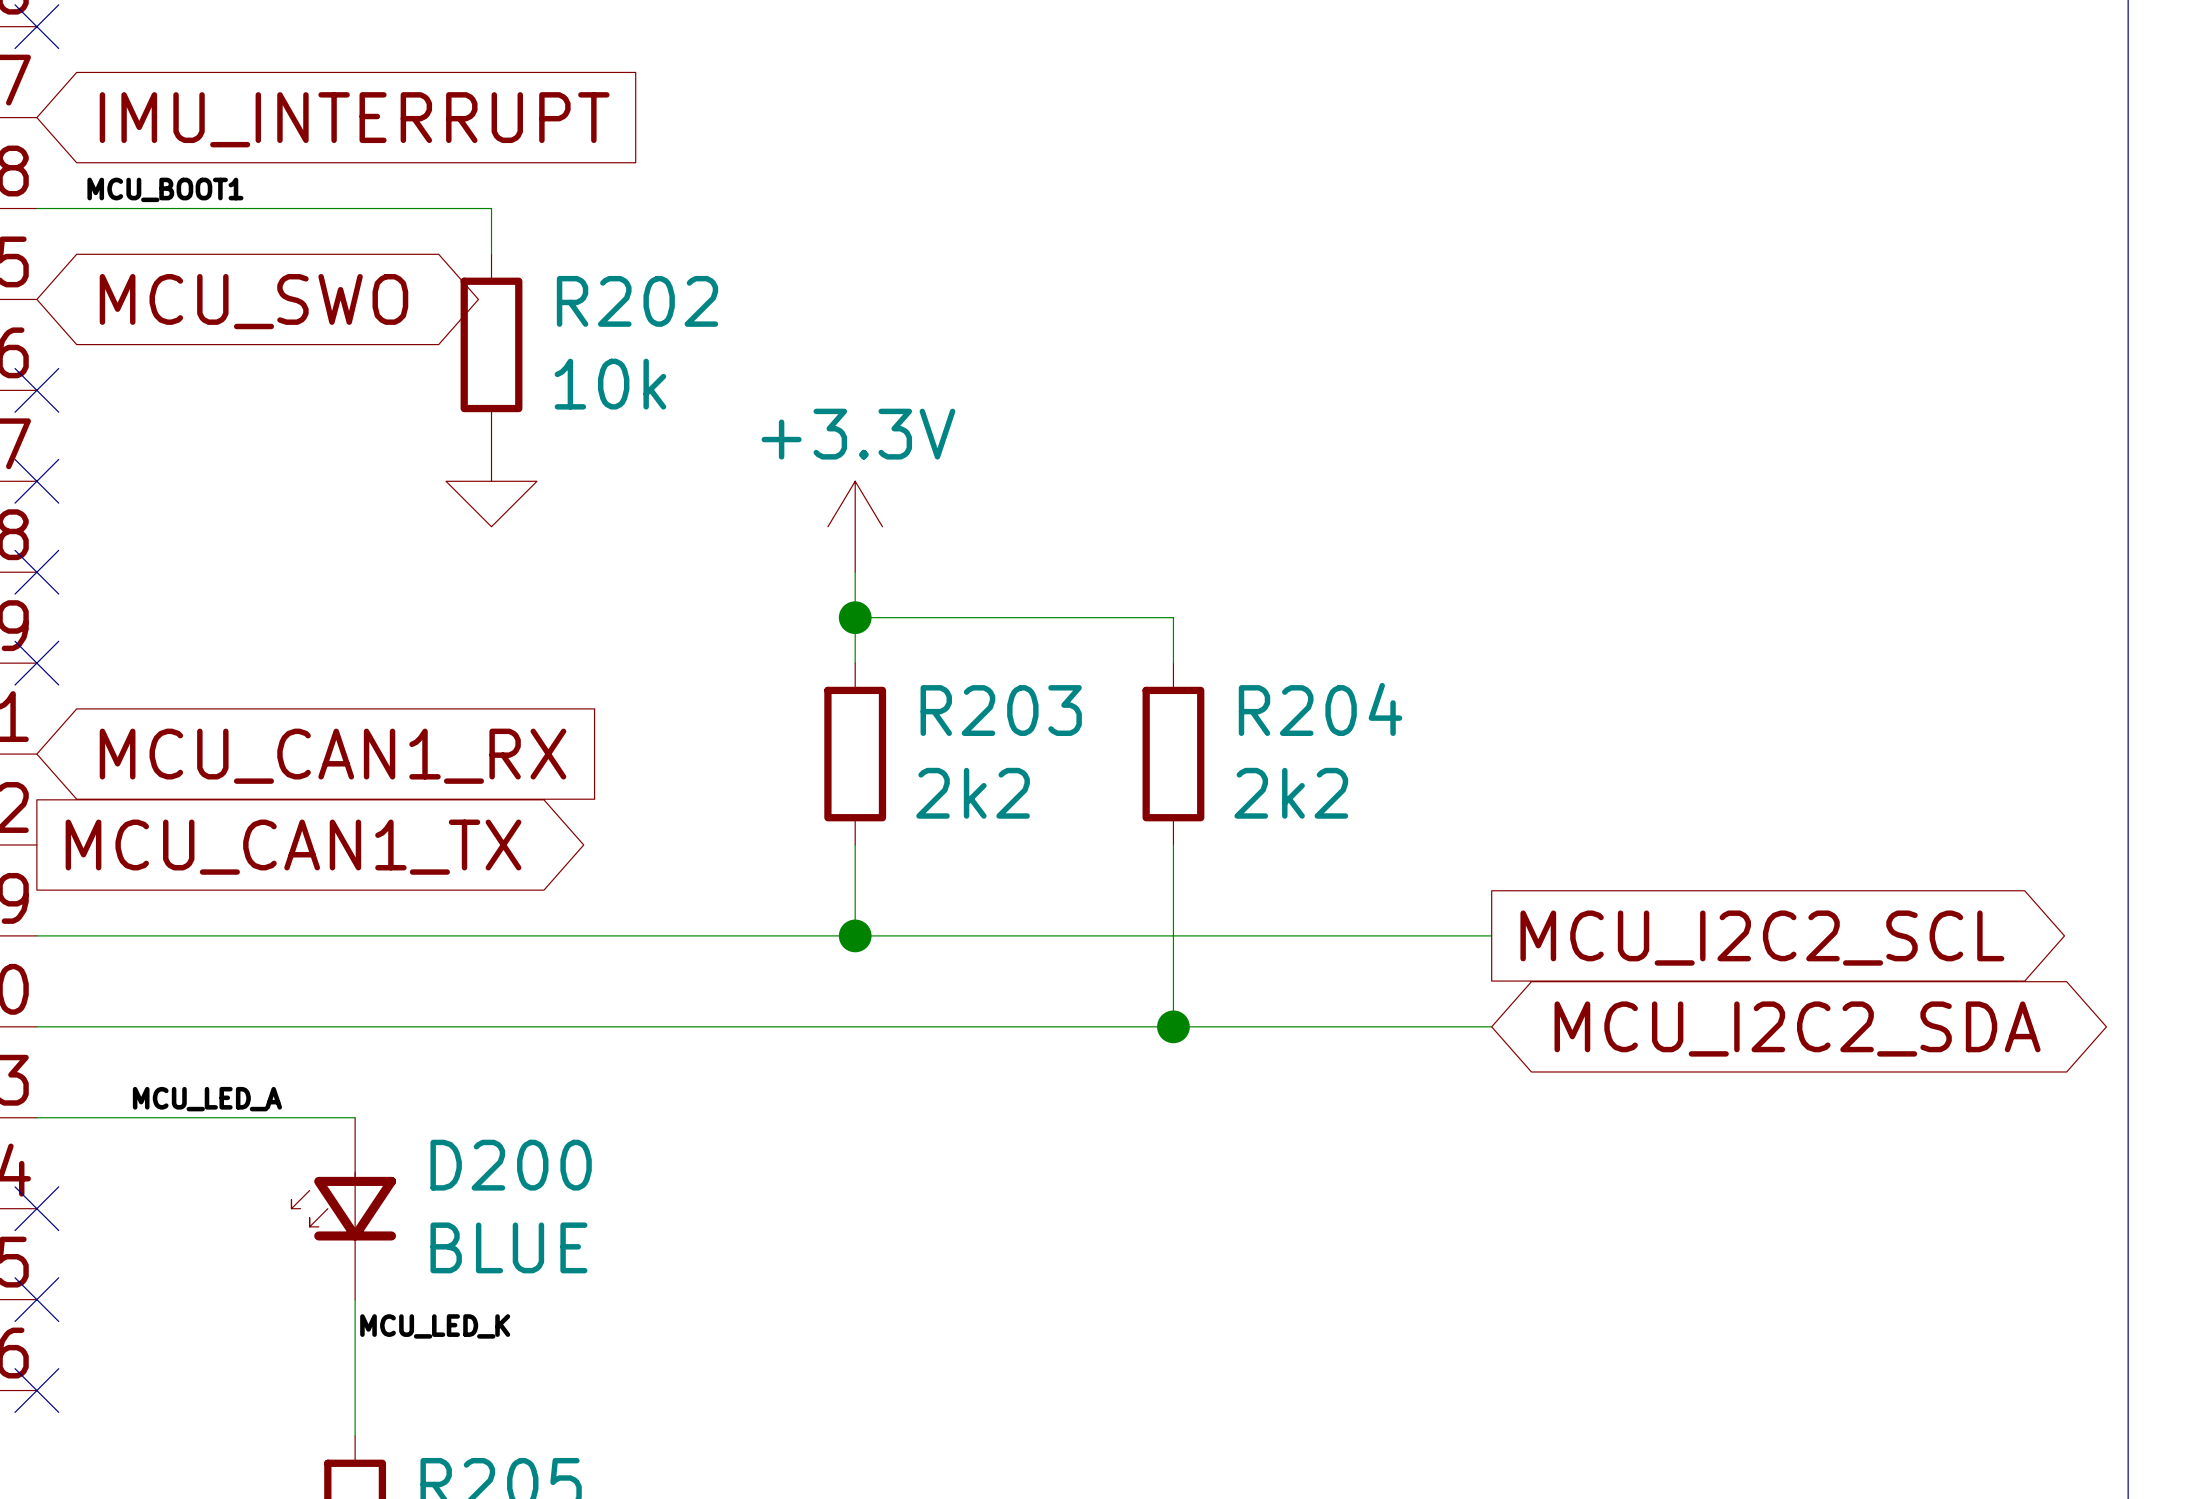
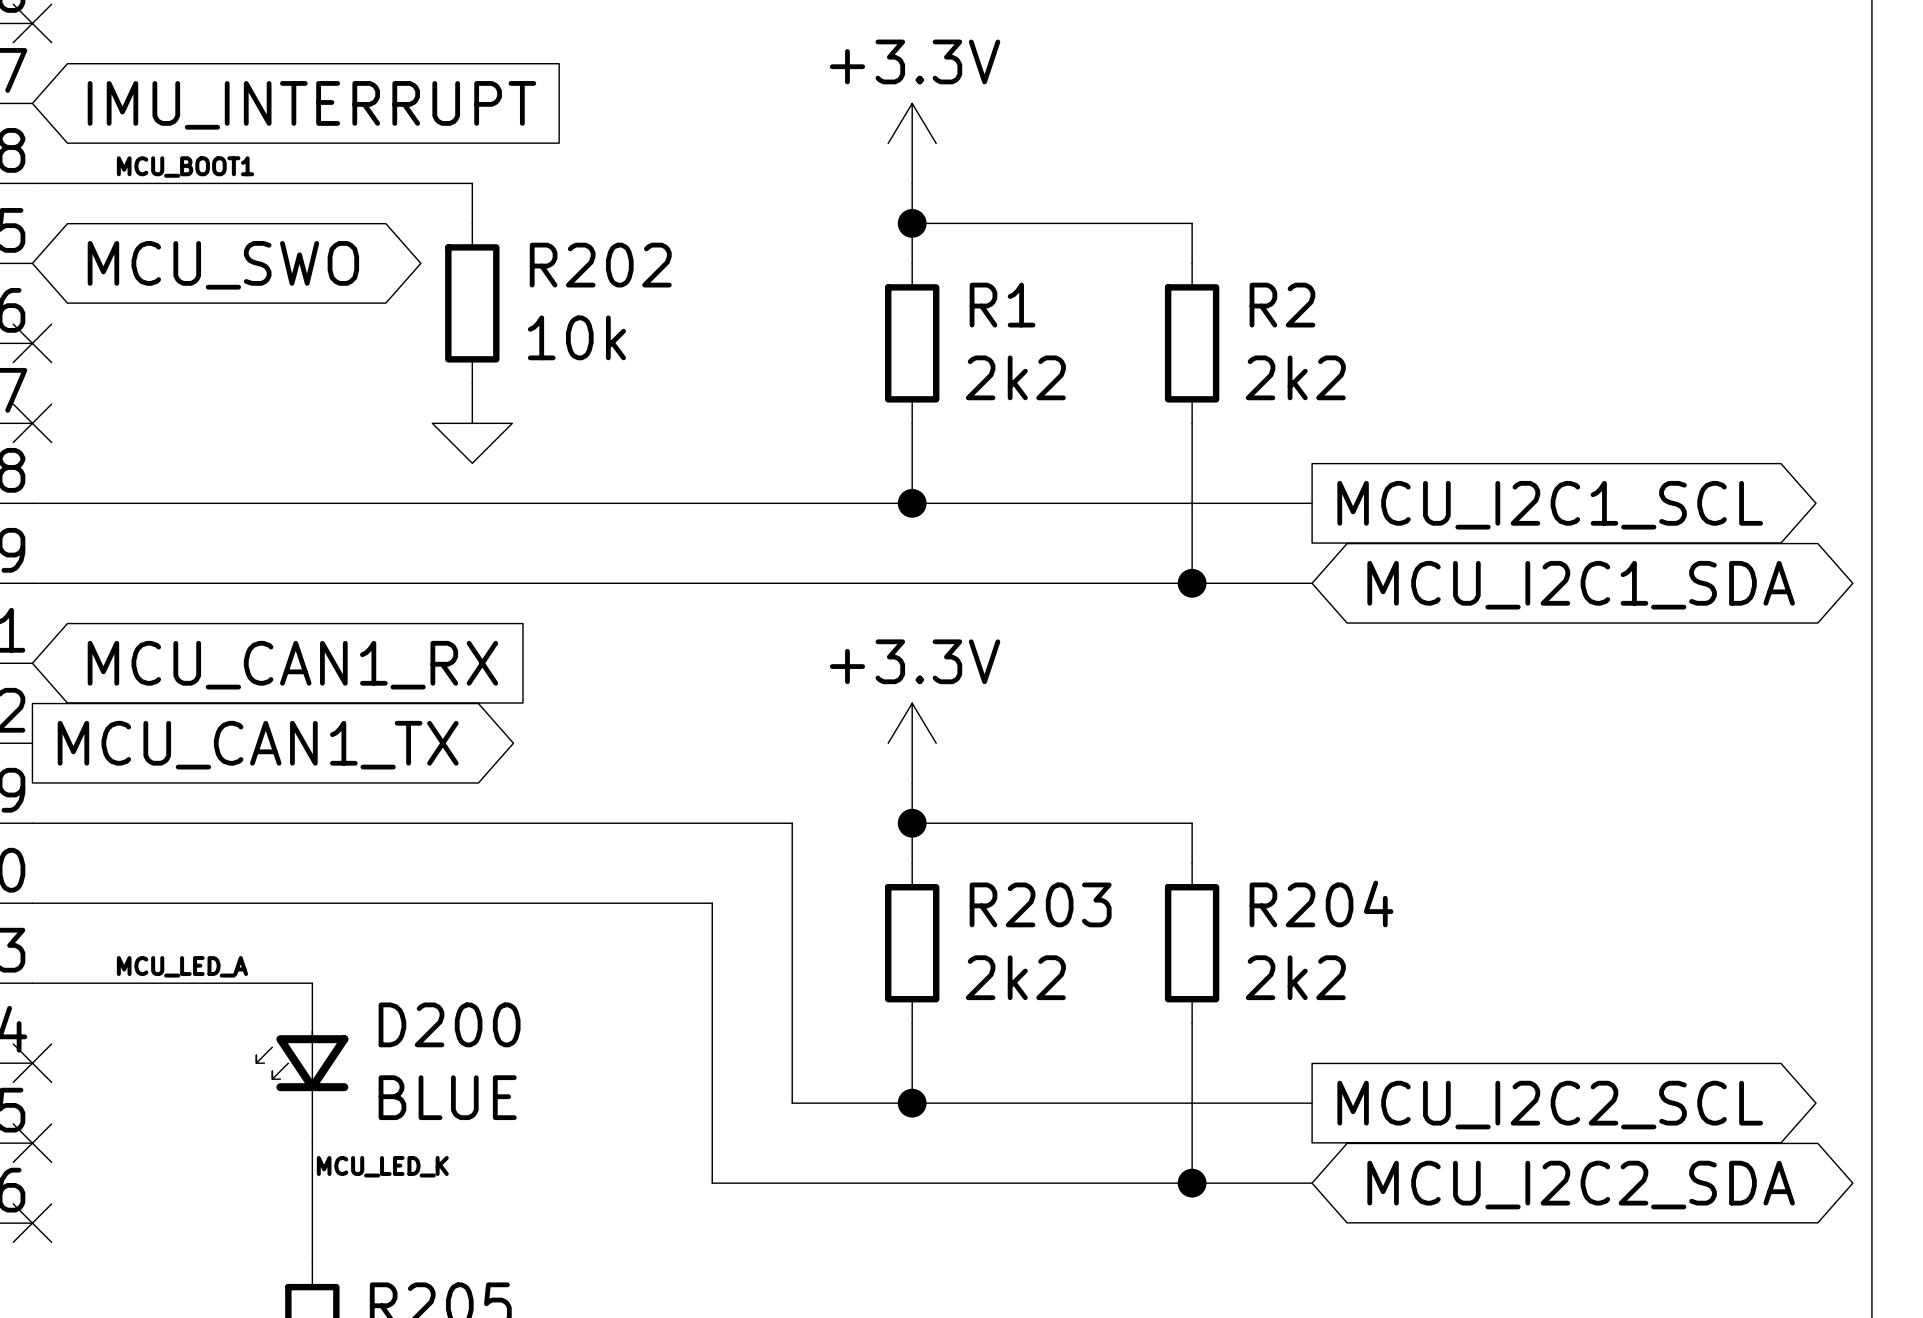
power symbol: none -> +3.3V (912, 143)
label position: MCU_BOOT1 (165, 189) -> MCU_BOOT1 (185, 167)
wire: (491, 208) (491, 253) -> (432, 183) (472, 183) (472, 223)
junction: none -> (912, 223)
R202 position: (491, 344) -> (472, 303)
R1: none -> 2k2 (912, 343)
R2: none -> 2k2 (1192, 343)
power symbol position: (491, 481) -> (472, 423)
power symbol: +3.3V (855, 526) -> none
wire: none -> (32, 503) (1312, 503)
no-connect mark: (36, 572) -> none
wire: (855, 572) (855, 663) -> (912, 183) (912, 263)
junction: none -> (912, 503)
global label: none -> MCU_I2C1_SCL (1550, 505)
wire: (855, 617) (1173, 617) (1173, 663) -> (912, 223) (1192, 223) (1192, 263)
junction: (855, 617) -> none
wire: none -> (32, 583) (1312, 583)
no-connect mark: (36, 663) -> none
junction: none -> (1192, 583)
global label: none -> MCU_I2C1_SDA (1581, 585)
R203 position: (855, 754) -> (912, 943)
R204 position: (1173, 754) -> (1192, 943)
wire: (855, 844) (855, 935) -> (912, 423) (912, 503)
power symbol: none -> +3.3V (912, 743)
wire: (1173, 844) (1173, 1026) -> (1192, 423) (1192, 583)
wire: none -> (912, 783) (912, 863)
junction: (855, 935) -> none
wire: (900, 935) (1037, 935) -> (792, 823) (792, 1103) (1312, 1103)
junction: none -> (912, 823)
wire: (1355, 935) (1491, 935) -> (1192, 823) (1192, 863)
global label position: MCU_I2C2_SCL (1762, 938) -> MCU_I2C2_SCL (1550, 1105)
wire: (809, 1026) (1491, 1026) -> (712, 903) (712, 1183) (1312, 1183)
junction: (1173, 1026) -> none
global label position: MCU_I2C2_SDA (1797, 1029) -> MCU_I2C2_SDA (1581, 1185)
wire: none -> (912, 1023) (912, 1103)
wire: none -> (1192, 1023) (1192, 1183)
junction: none -> (912, 1103)
junction: none -> (1192, 1183)

